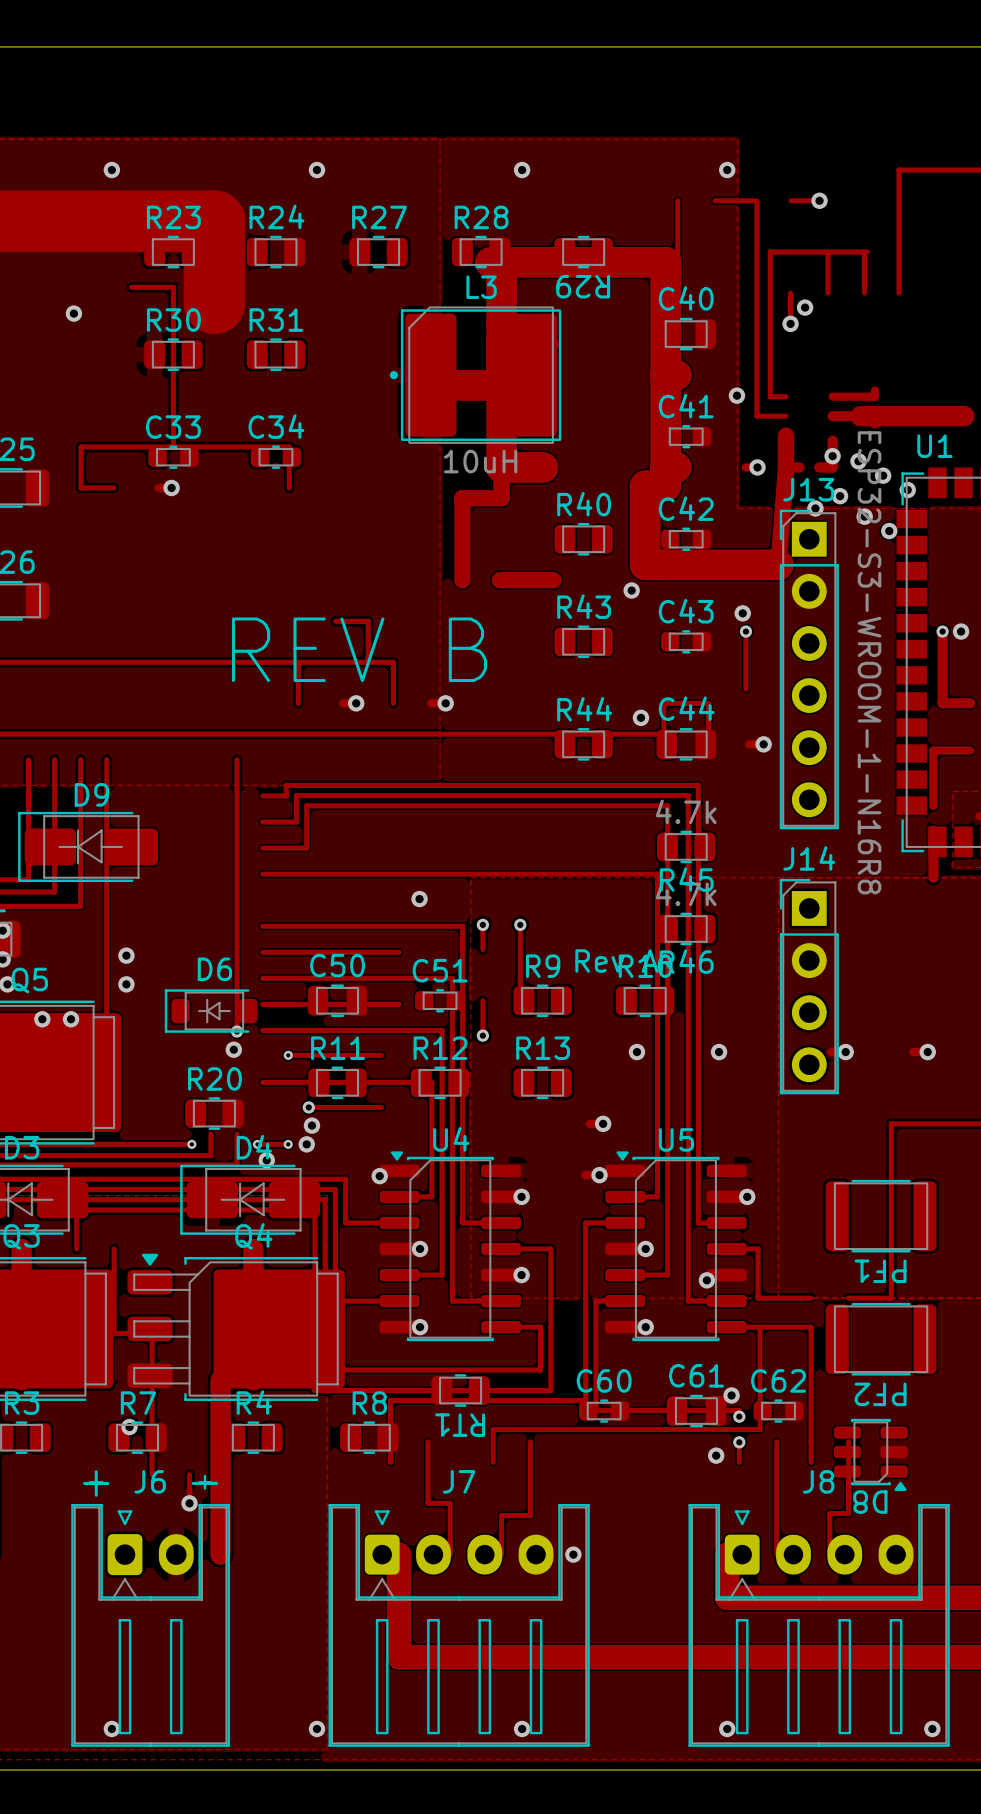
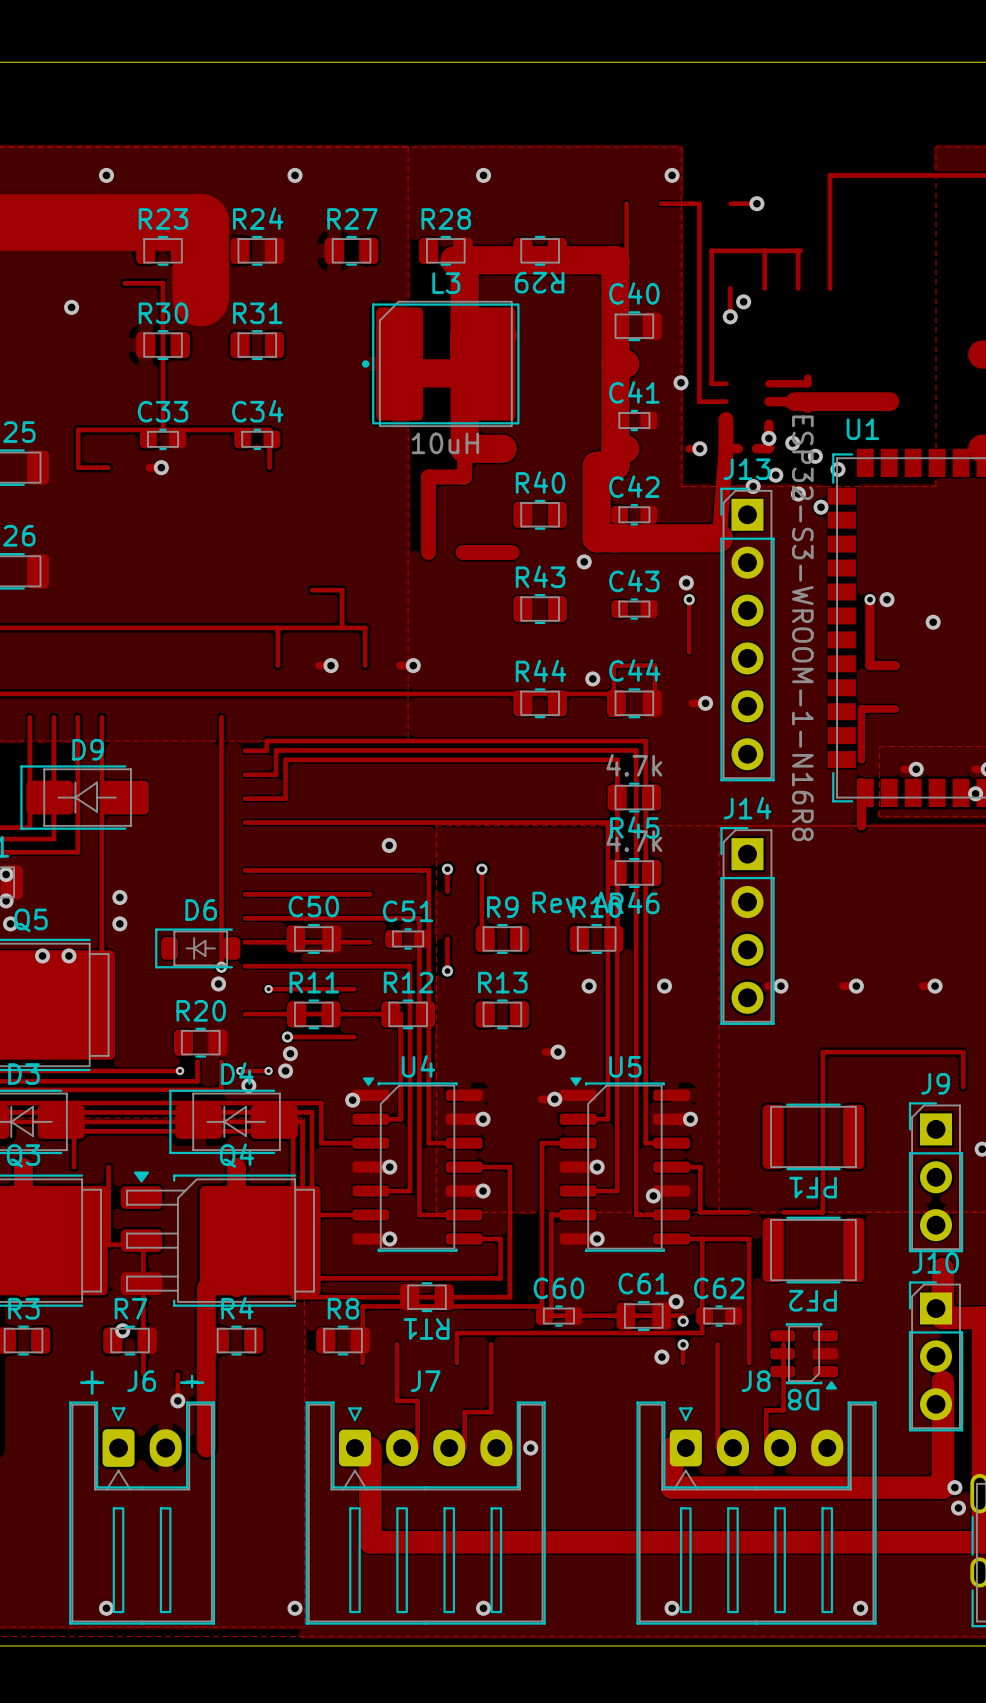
text: REV B (359, 649) -> none

